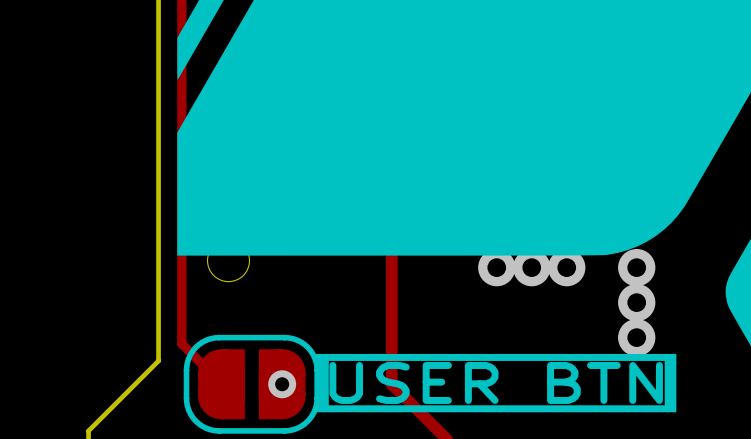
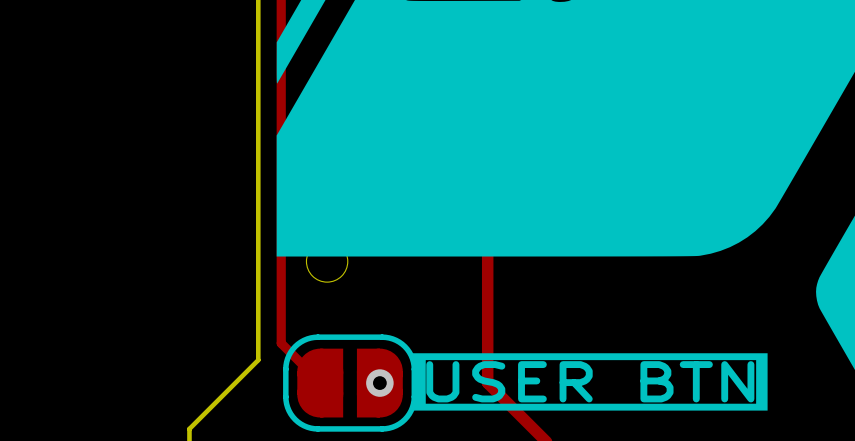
via: (496, 267) -> none
via: (531, 267) -> none
via: (566, 267) -> none
via: (636, 267) -> none
via: (636, 302) -> none
via: (636, 337) -> none

